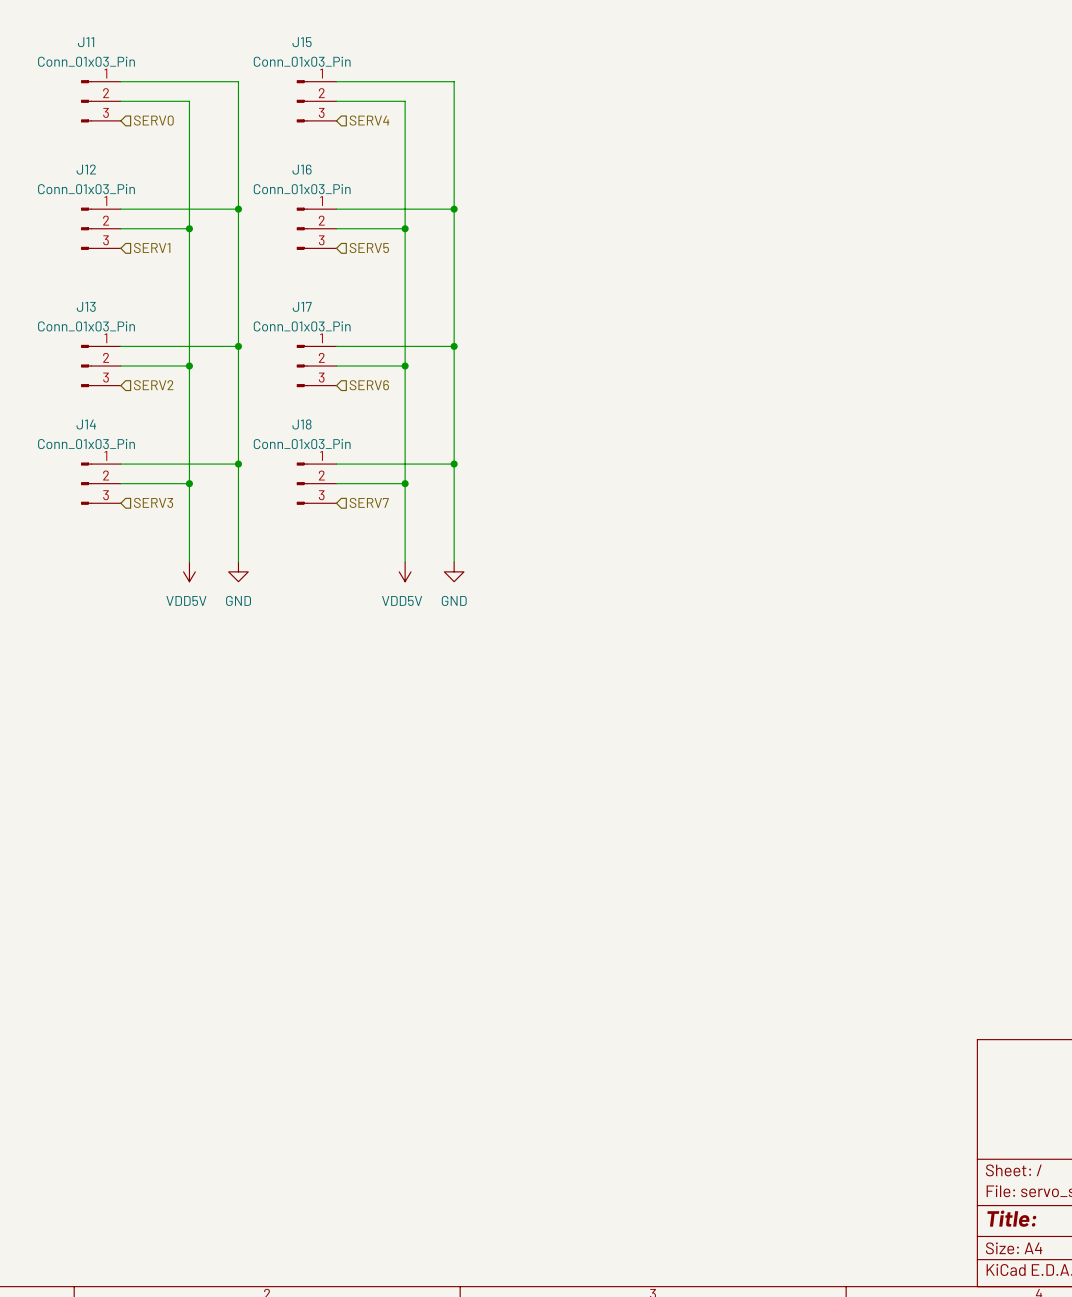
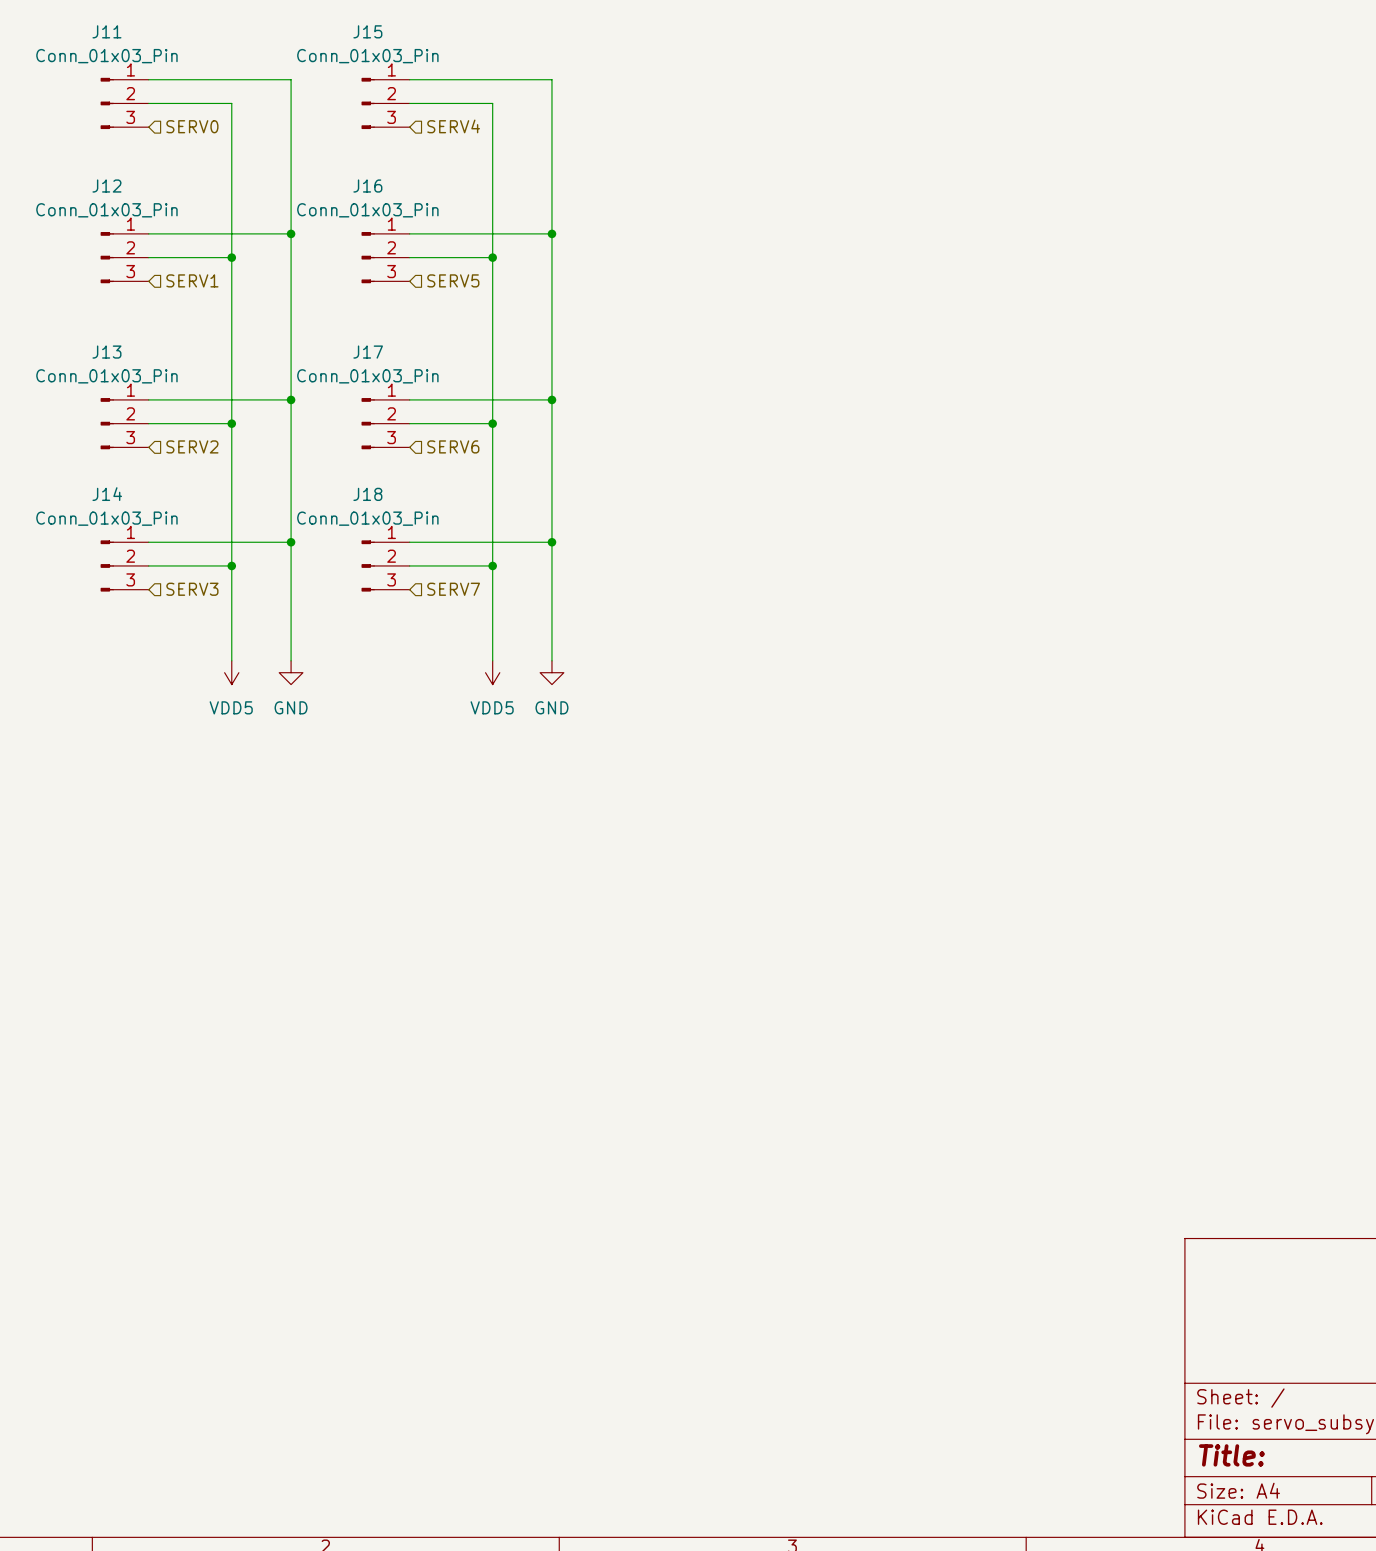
power symbol: VDD5V (189, 571) -> VDD5 (231, 672)
power symbol: VDD5V (405, 571) -> VDD5 (492, 672)

